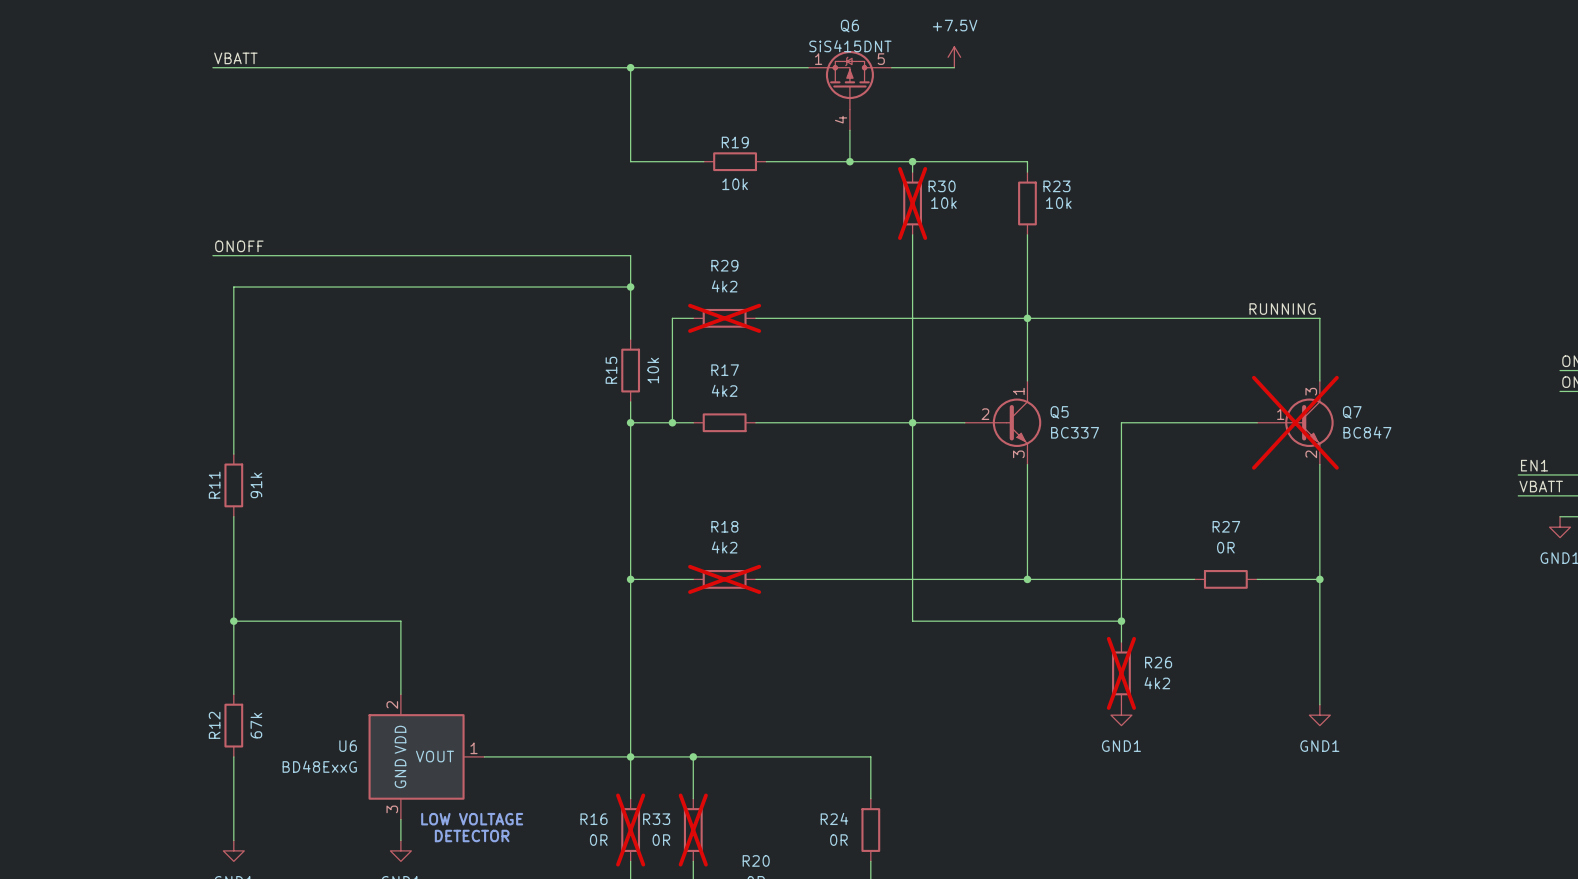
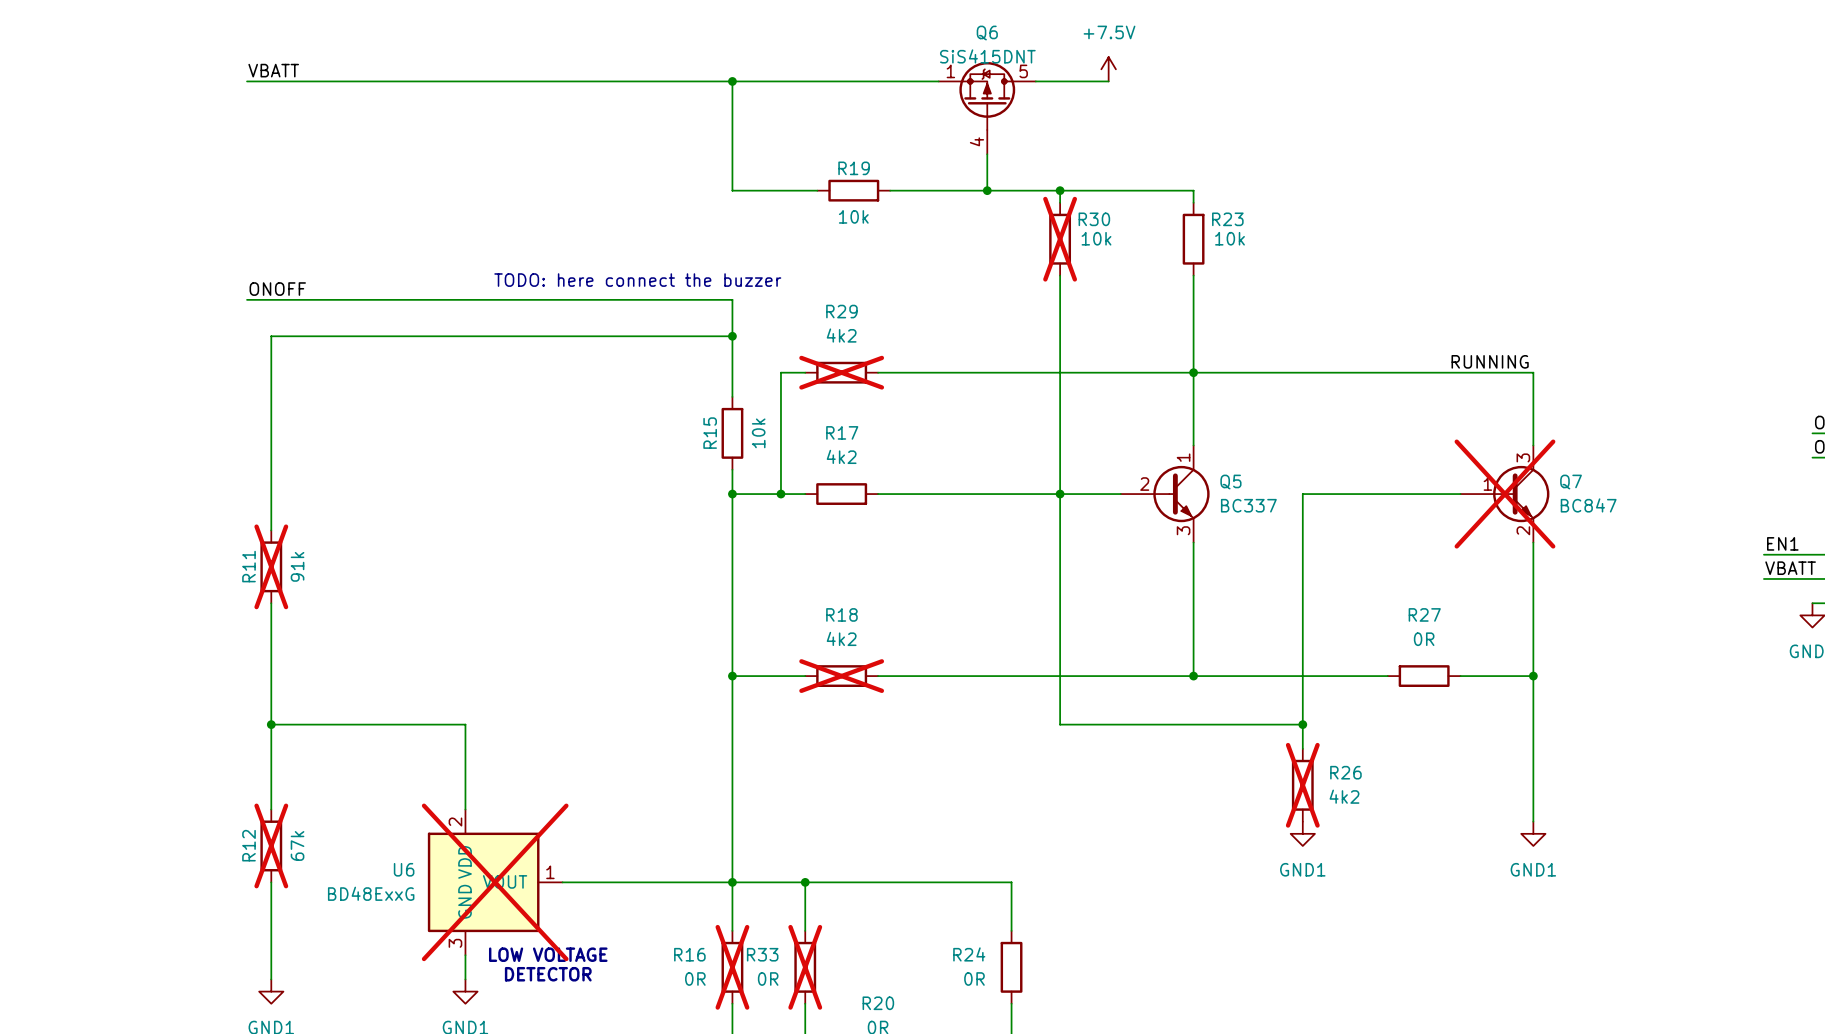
text: none -> TODO: here connect the buzzer (637, 280)
R11 do-not-place cross: none -> (271, 566)
R12 do-not-place cross: none -> (271, 845)
U6 do-not-place cross: none -> (495, 882)

